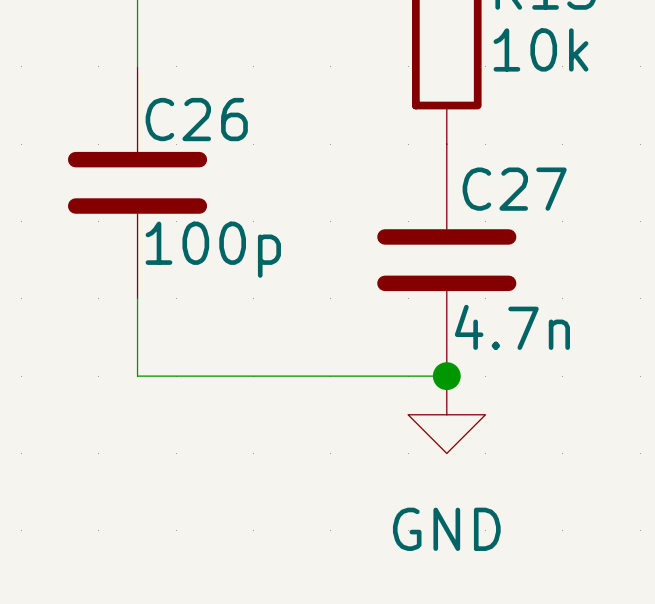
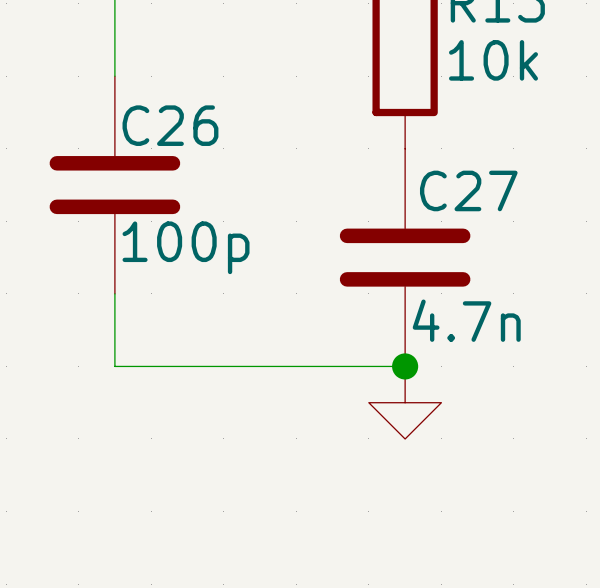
power symbol text: GND (446, 529) -> none

